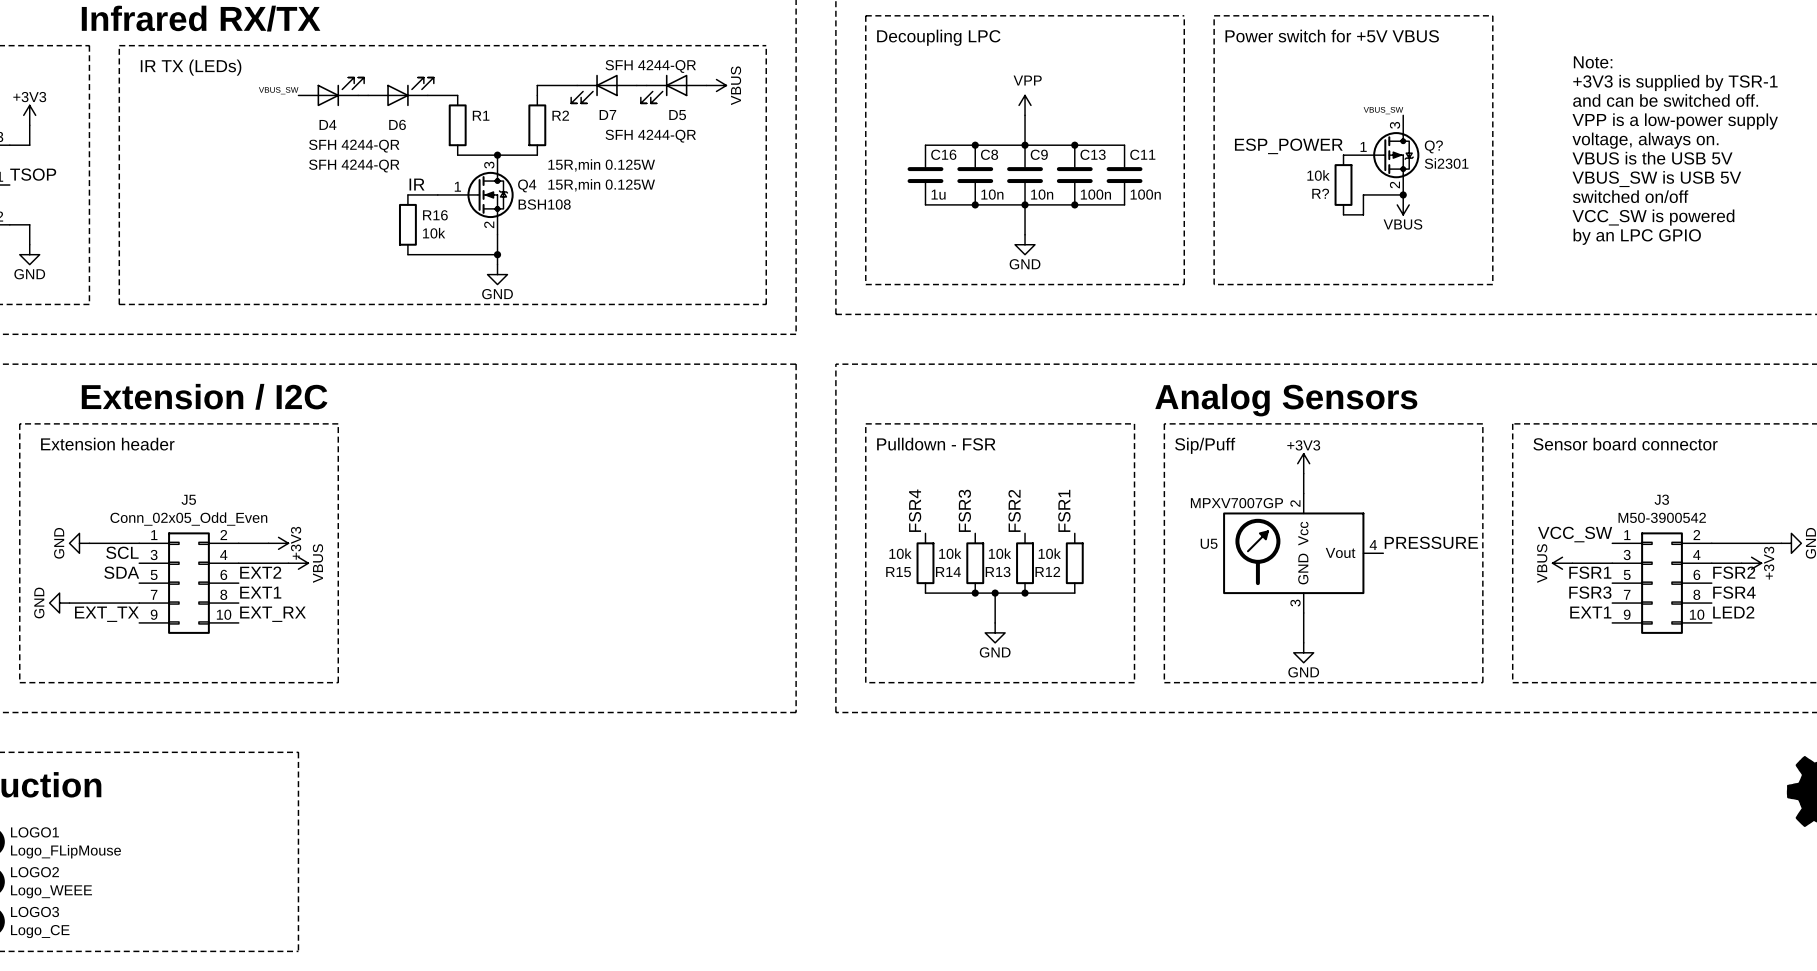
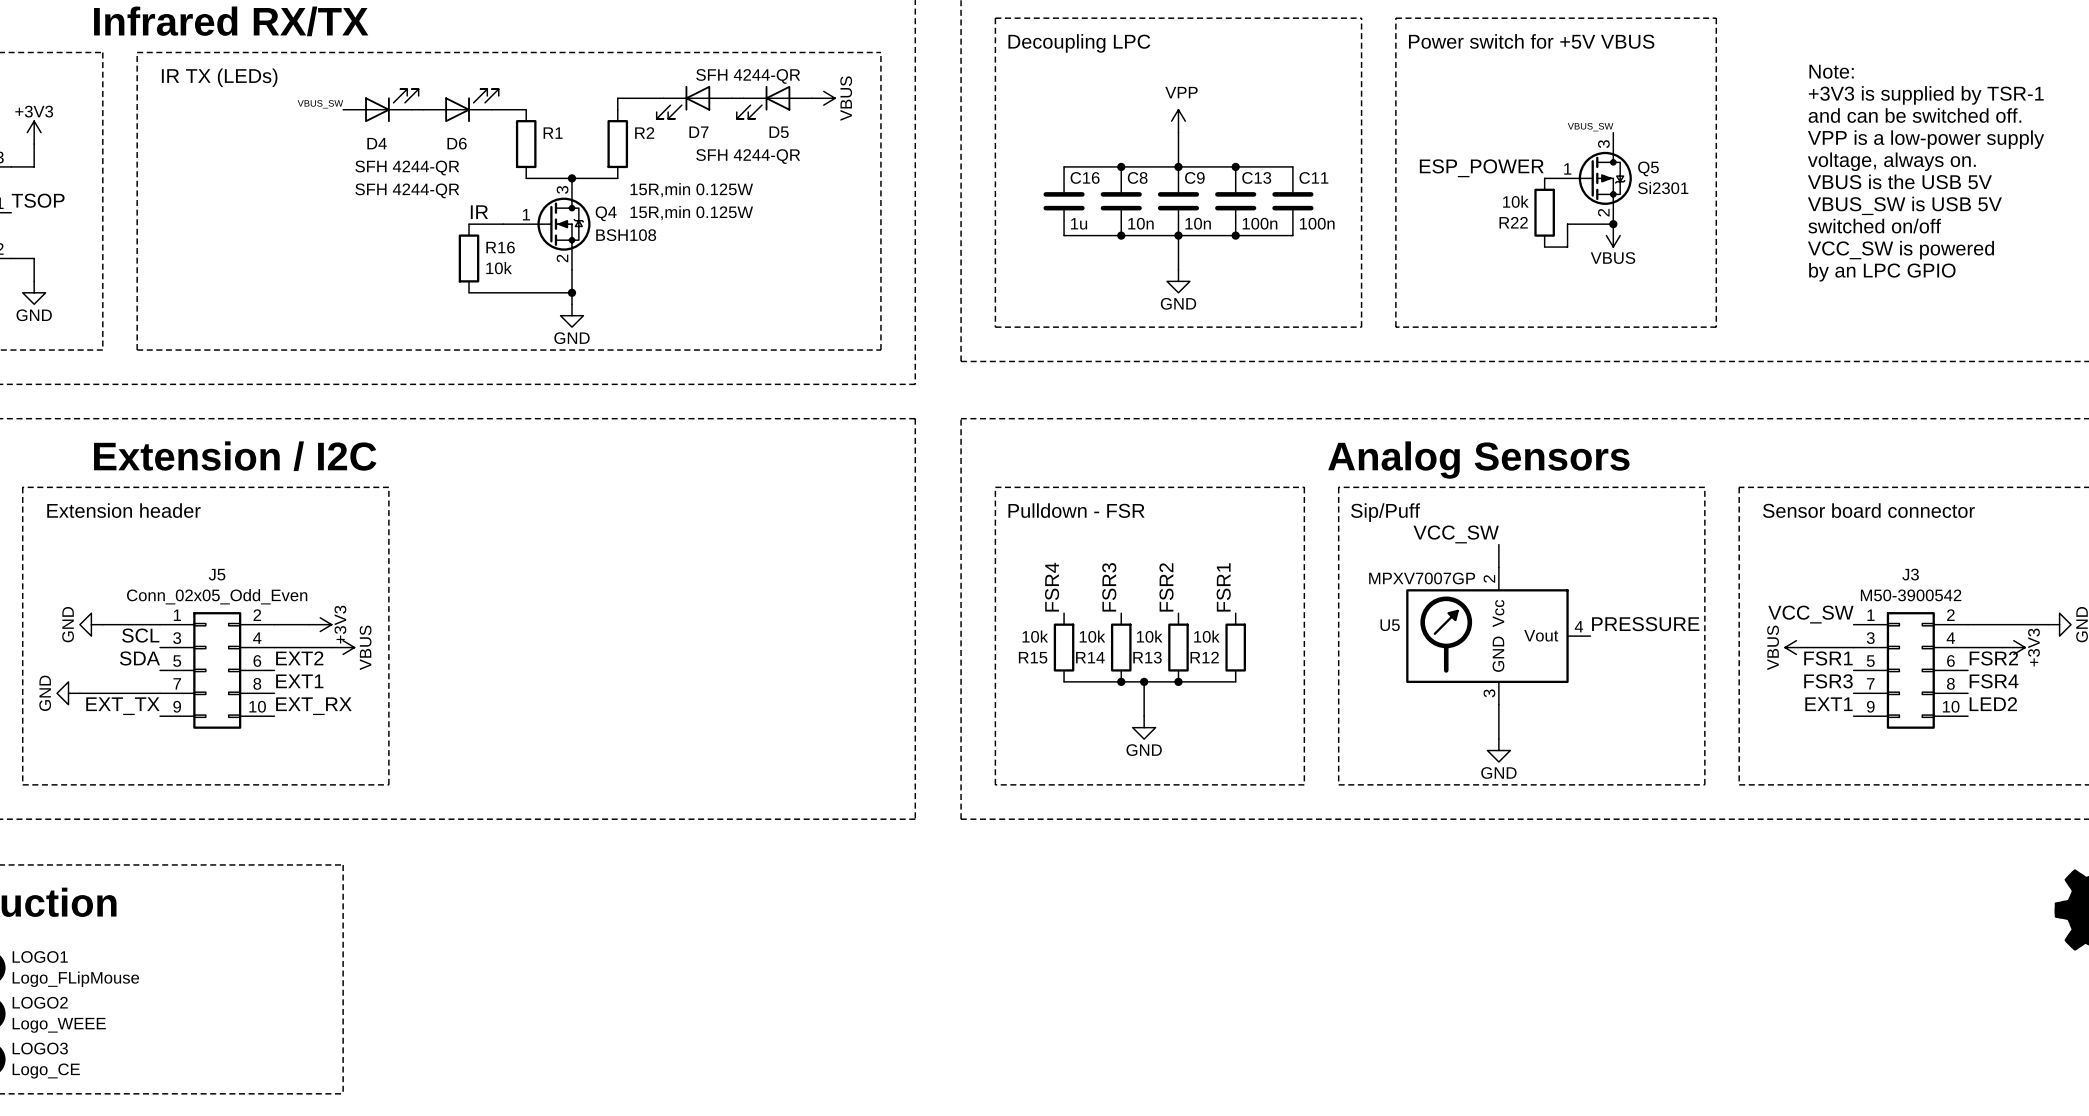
Q? name: Q? (1433, 146) -> Q5 (1648, 168)
R? name: R? (1320, 193) -> R22 (1513, 222)
power symbol: +3V3 (1303, 463) -> none
label: none -> VCC_SW (1456, 534)

